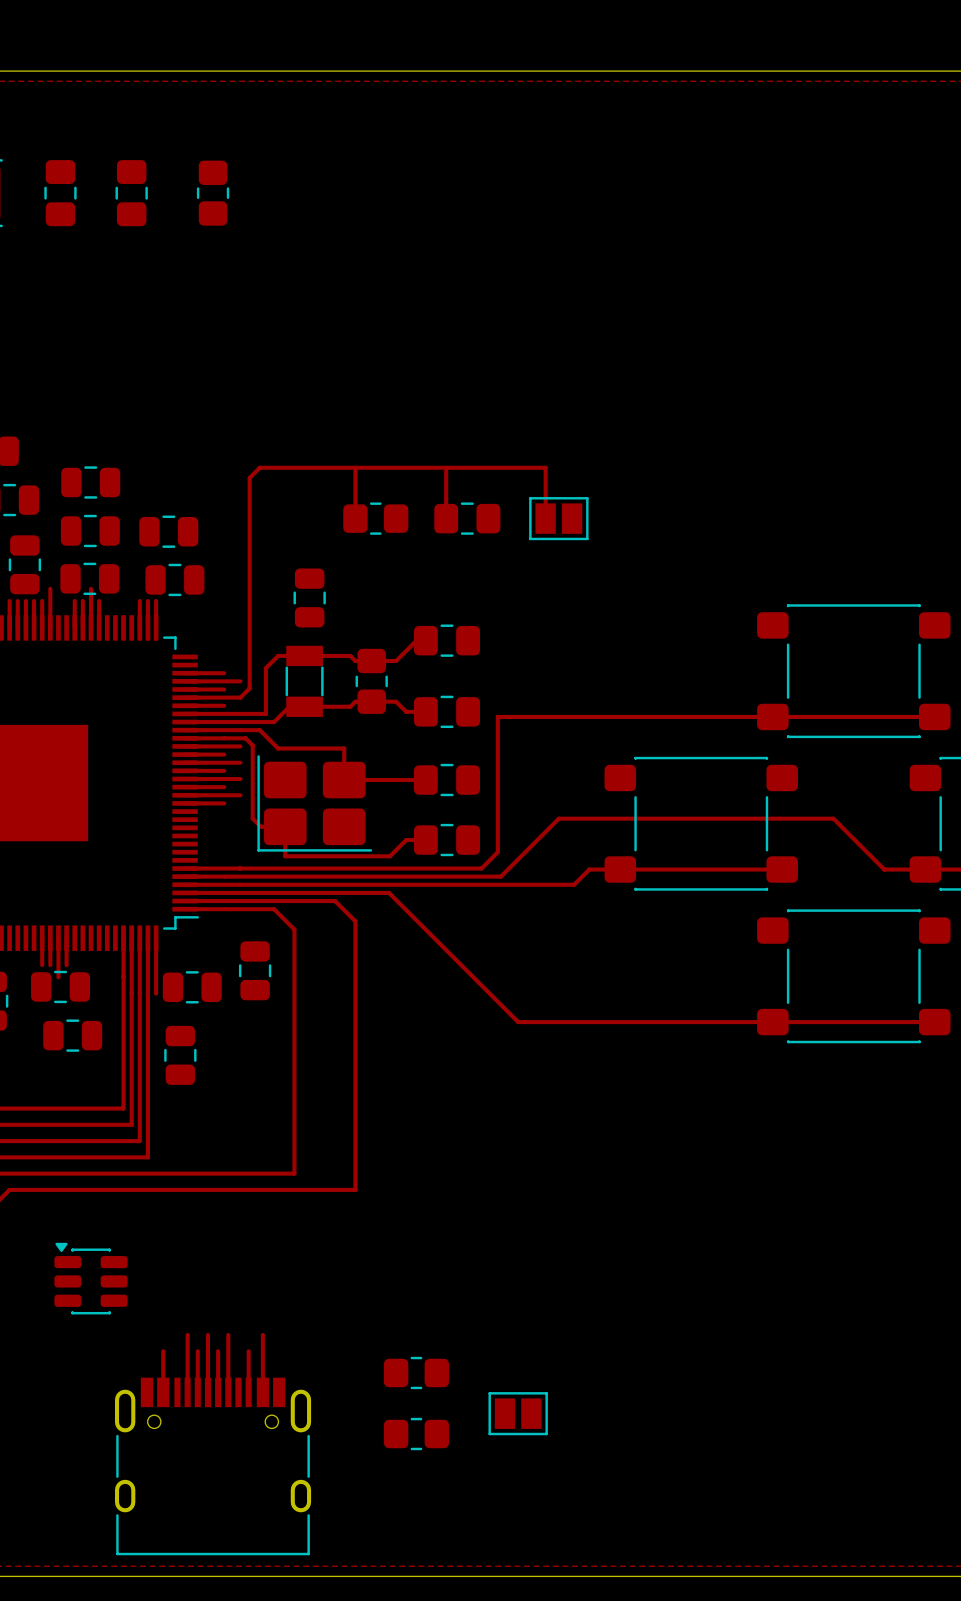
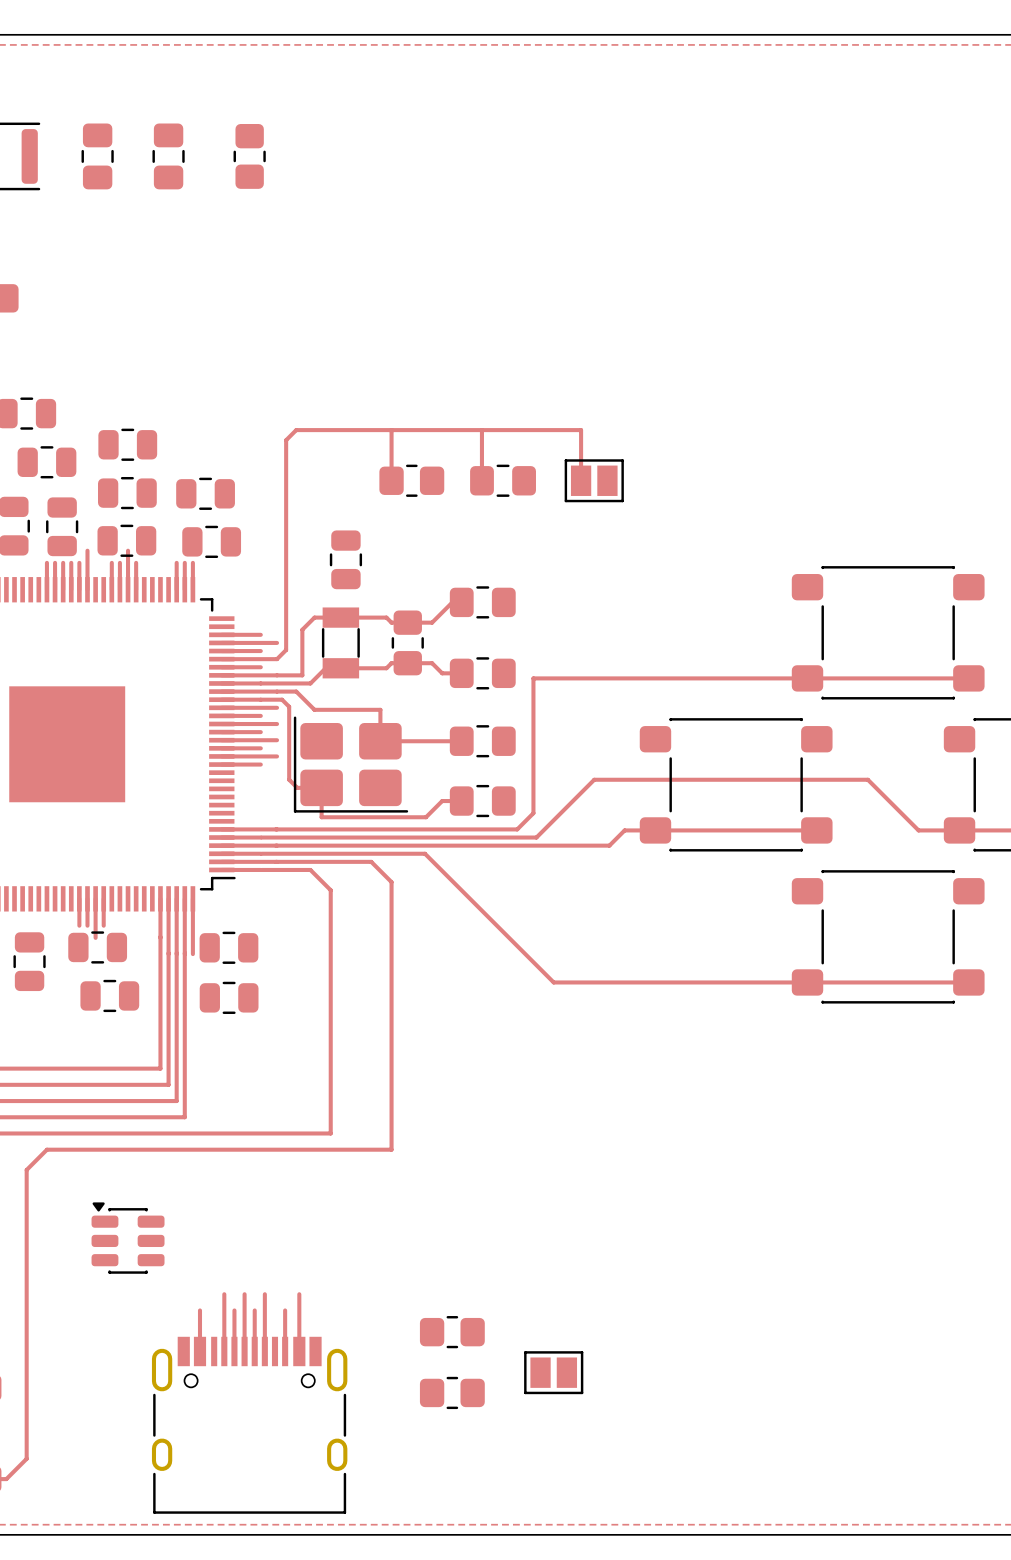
part: (255, 970) -> none
part rotation: 0° (180, 1055) -> 90° clockwise (229, 997)

